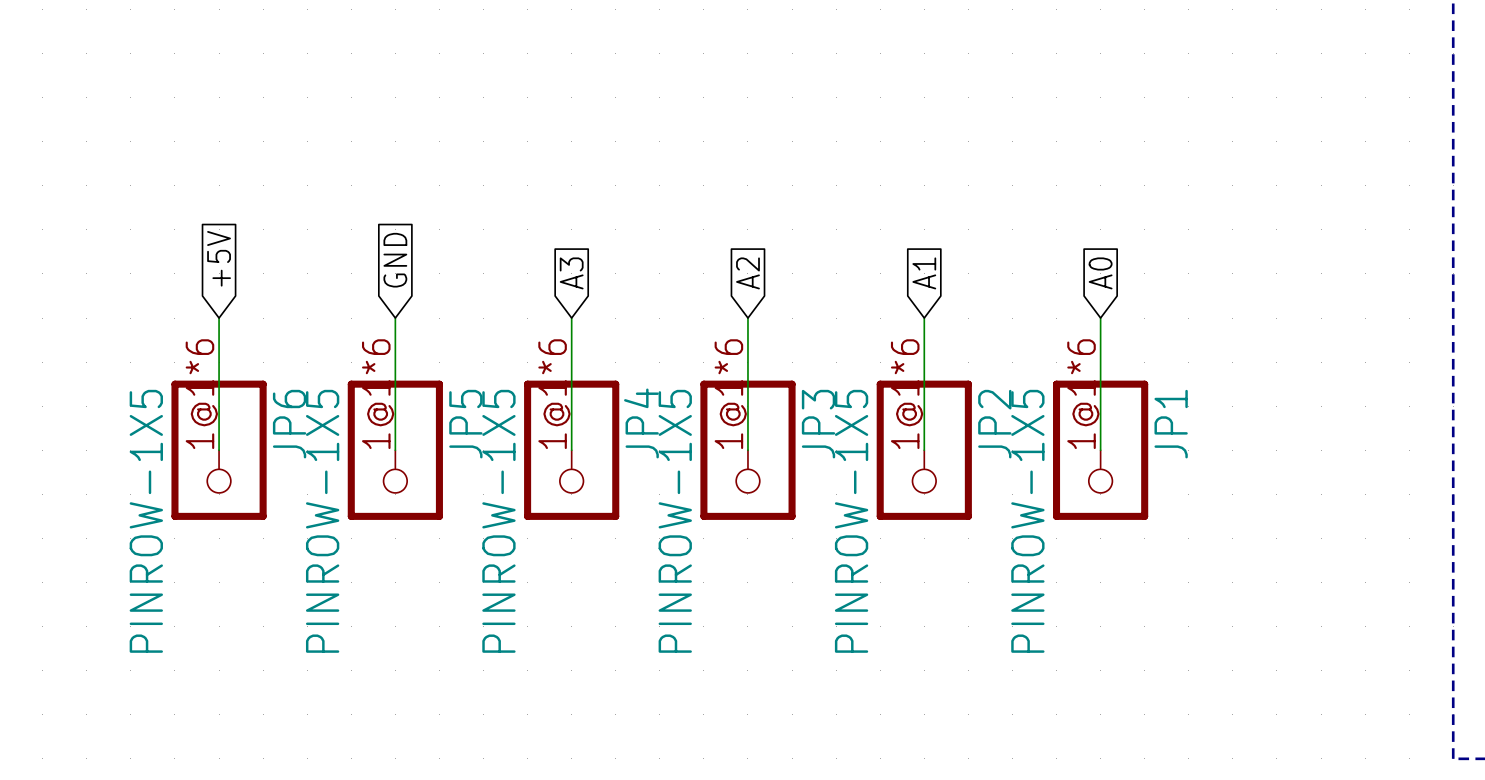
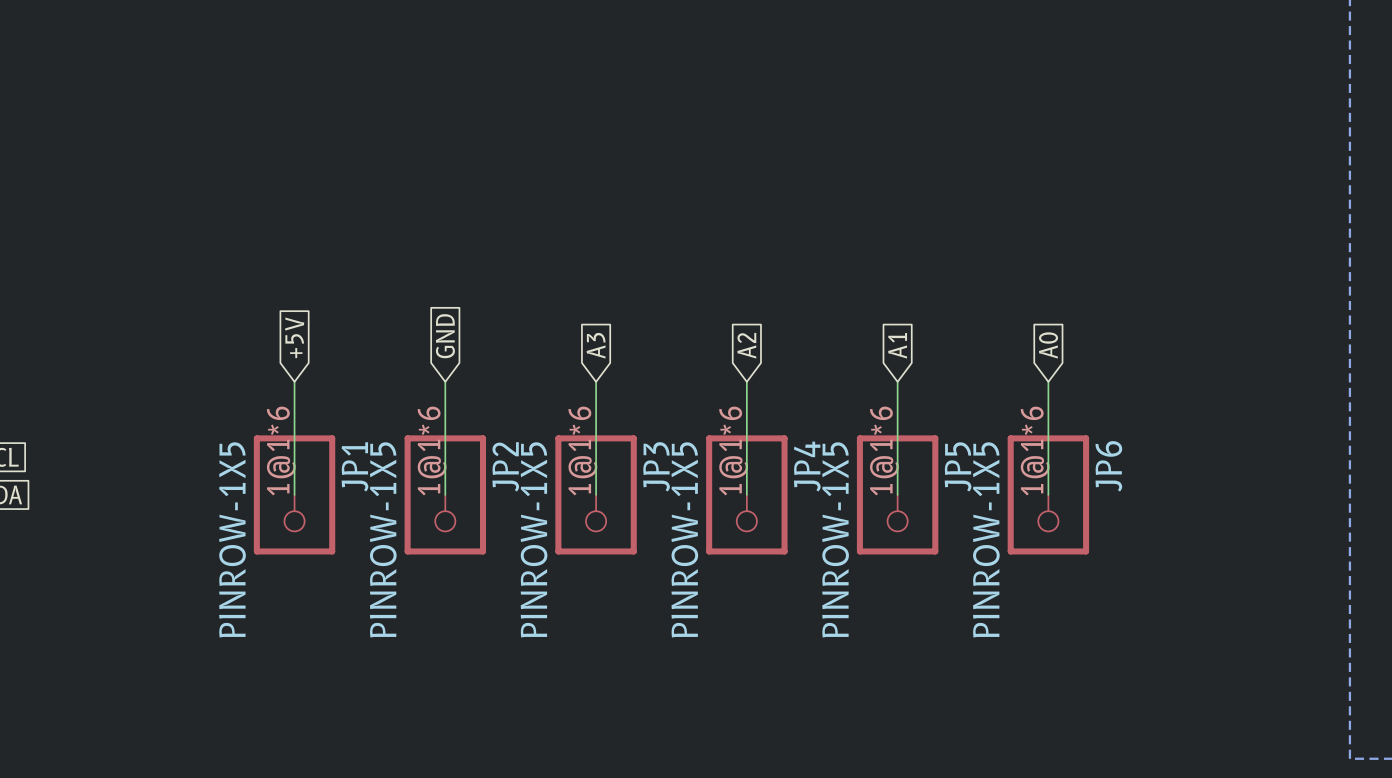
JP4 name: JP4 (641, 423) -> JP3 (656, 466)
JP6 name: JP6 (289, 424) -> JP1 (354, 466)
JP5 name: JP5 (465, 424) -> JP2 (505, 466)
JP3 name: JP3 (818, 424) -> JP4 (807, 466)
JP2 name: JP2 (994, 424) -> JP5 (958, 466)
JP1 name: JP1 (1171, 424) -> JP6 (1108, 466)

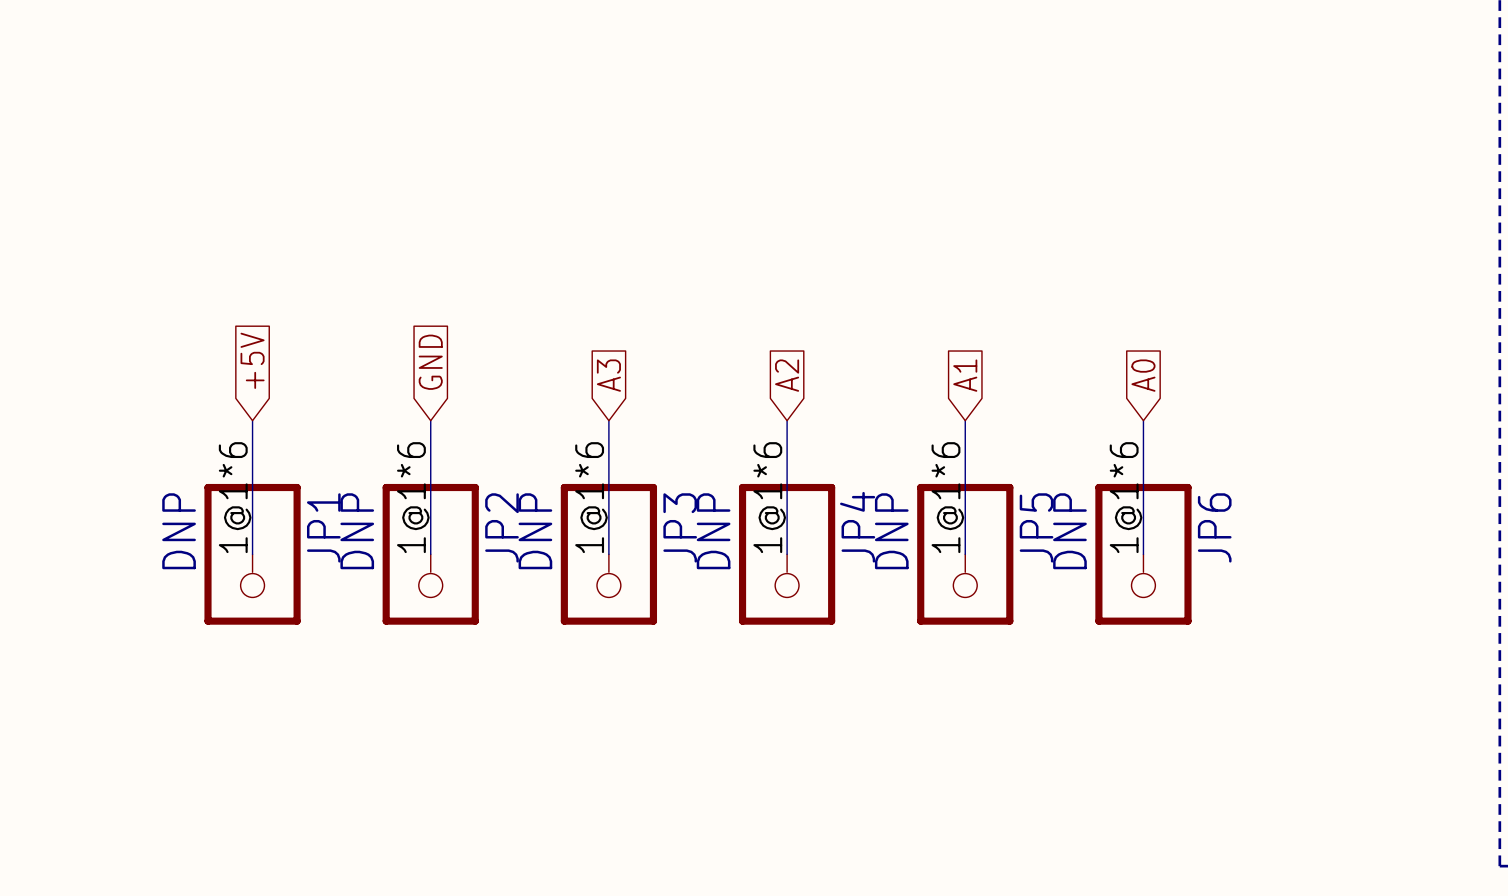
JP1 value: PINROW-1X5 (232, 539) -> DNP (179, 531)
JP2 value: PINROW-1X5 (383, 539) -> DNP (357, 531)
JP3 value: PINROW-1X5 (534, 539) -> DNP (535, 531)
JP4 value: PINROW-1X5 (684, 539) -> DNP (713, 531)
JP5 value: PINROW-1X5 (835, 539) -> DNP (891, 531)
JP6 value: PINROW-1X5 (986, 539) -> DNP (1069, 531)

